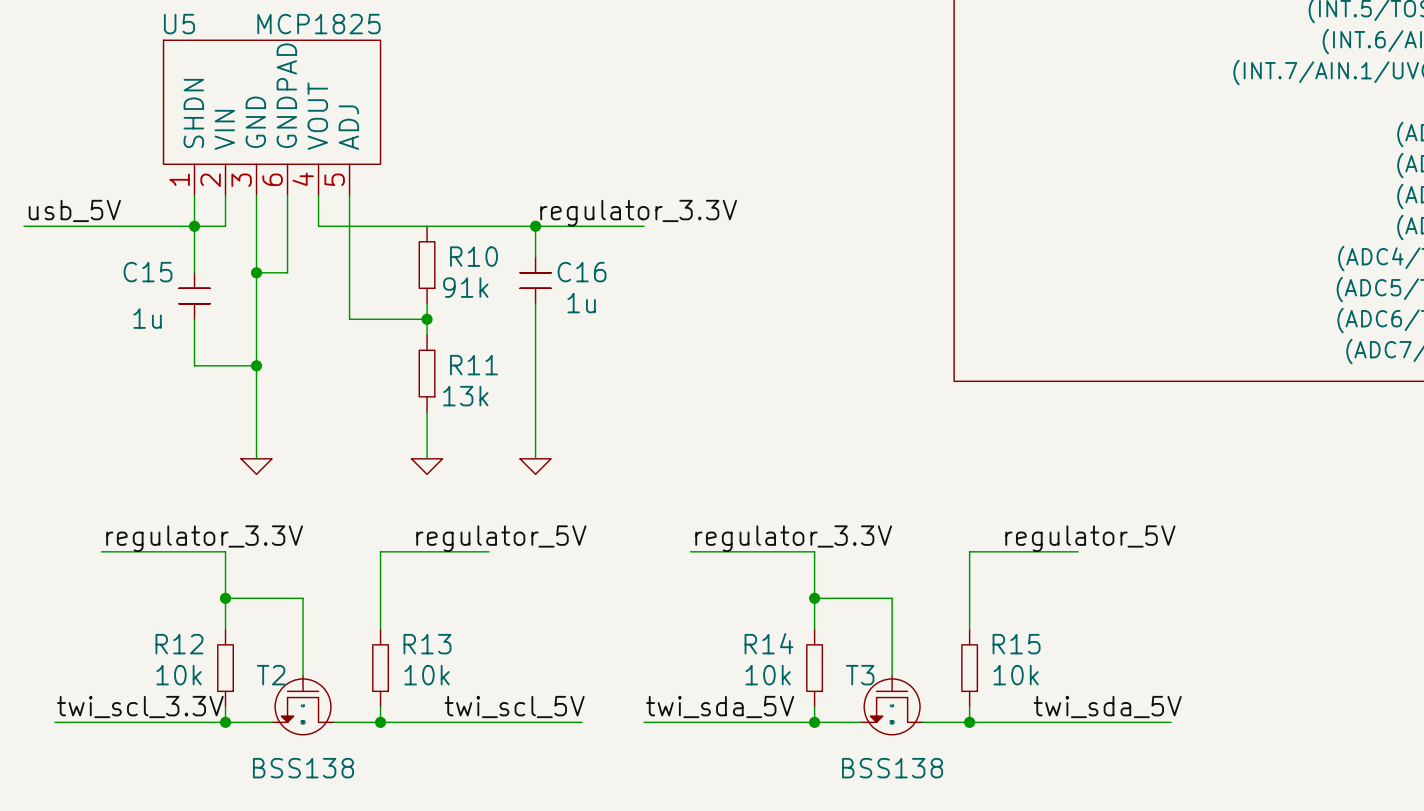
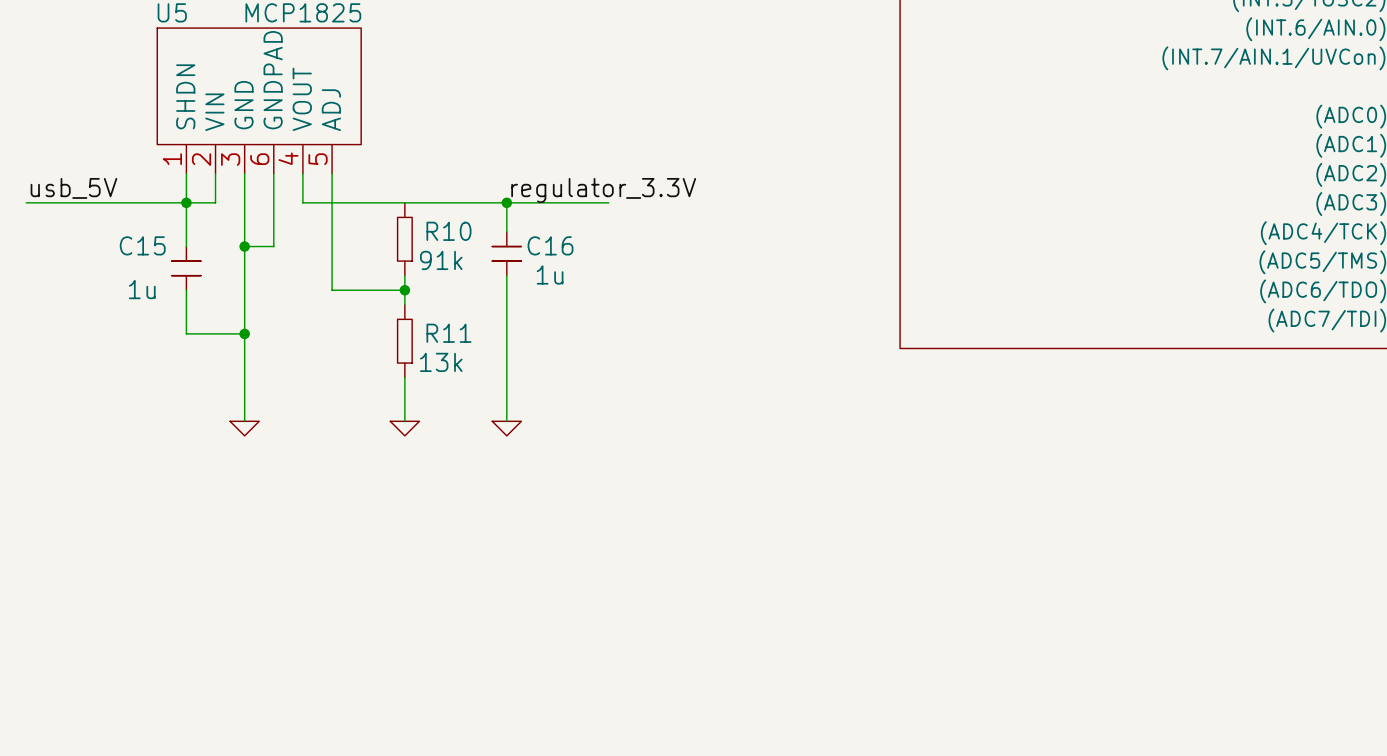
label: regulator_3.3V (204, 538) -> none
label: regulator_5V (501, 538) -> none
label: regulator_3.3V (793, 538) -> none
label: regulator_5V (1090, 538) -> none
wire: (101, 551) (225, 551) (225, 629) -> none
wire: (489, 551) (380, 551) (380, 629) -> none
wire: (690, 551) (814, 551) (814, 629) -> none
wire: (1078, 551) (969, 551) (969, 629) -> none
wire: (225, 598) (303, 598) (303, 675) -> none
junction: (225, 598) -> none
wire: (814, 598) (892, 598) (892, 675) -> none
junction: (814, 598) -> none
R12: (225, 668) -> none
R13: (380, 668) -> none
R14: (814, 668) -> none
R15: (969, 668) -> none
T2: BSS138 (303, 705) -> none
T3: BSS138 (892, 705) -> none
wire: (225, 706) (225, 722) -> none
wire: (380, 706) (380, 722) -> none
wire: (814, 706) (814, 722) -> none
wire: (969, 706) (969, 722) -> none
label: twi_scl_3.3V (140, 707) -> none
label: twi_scl_5V (514, 707) -> none
label: twi_sda_5V (720, 707) -> none
label: twi_sda_5V (1107, 707) -> none
wire: (55, 722) (272, 722) -> none
junction: (225, 722) -> none
wire: (334, 722) (582, 722) -> none
junction: (380, 722) -> none
wire: (644, 722) (861, 722) -> none
junction: (814, 722) -> none
wire: (923, 722) (1171, 722) -> none
junction: (969, 722) -> none

